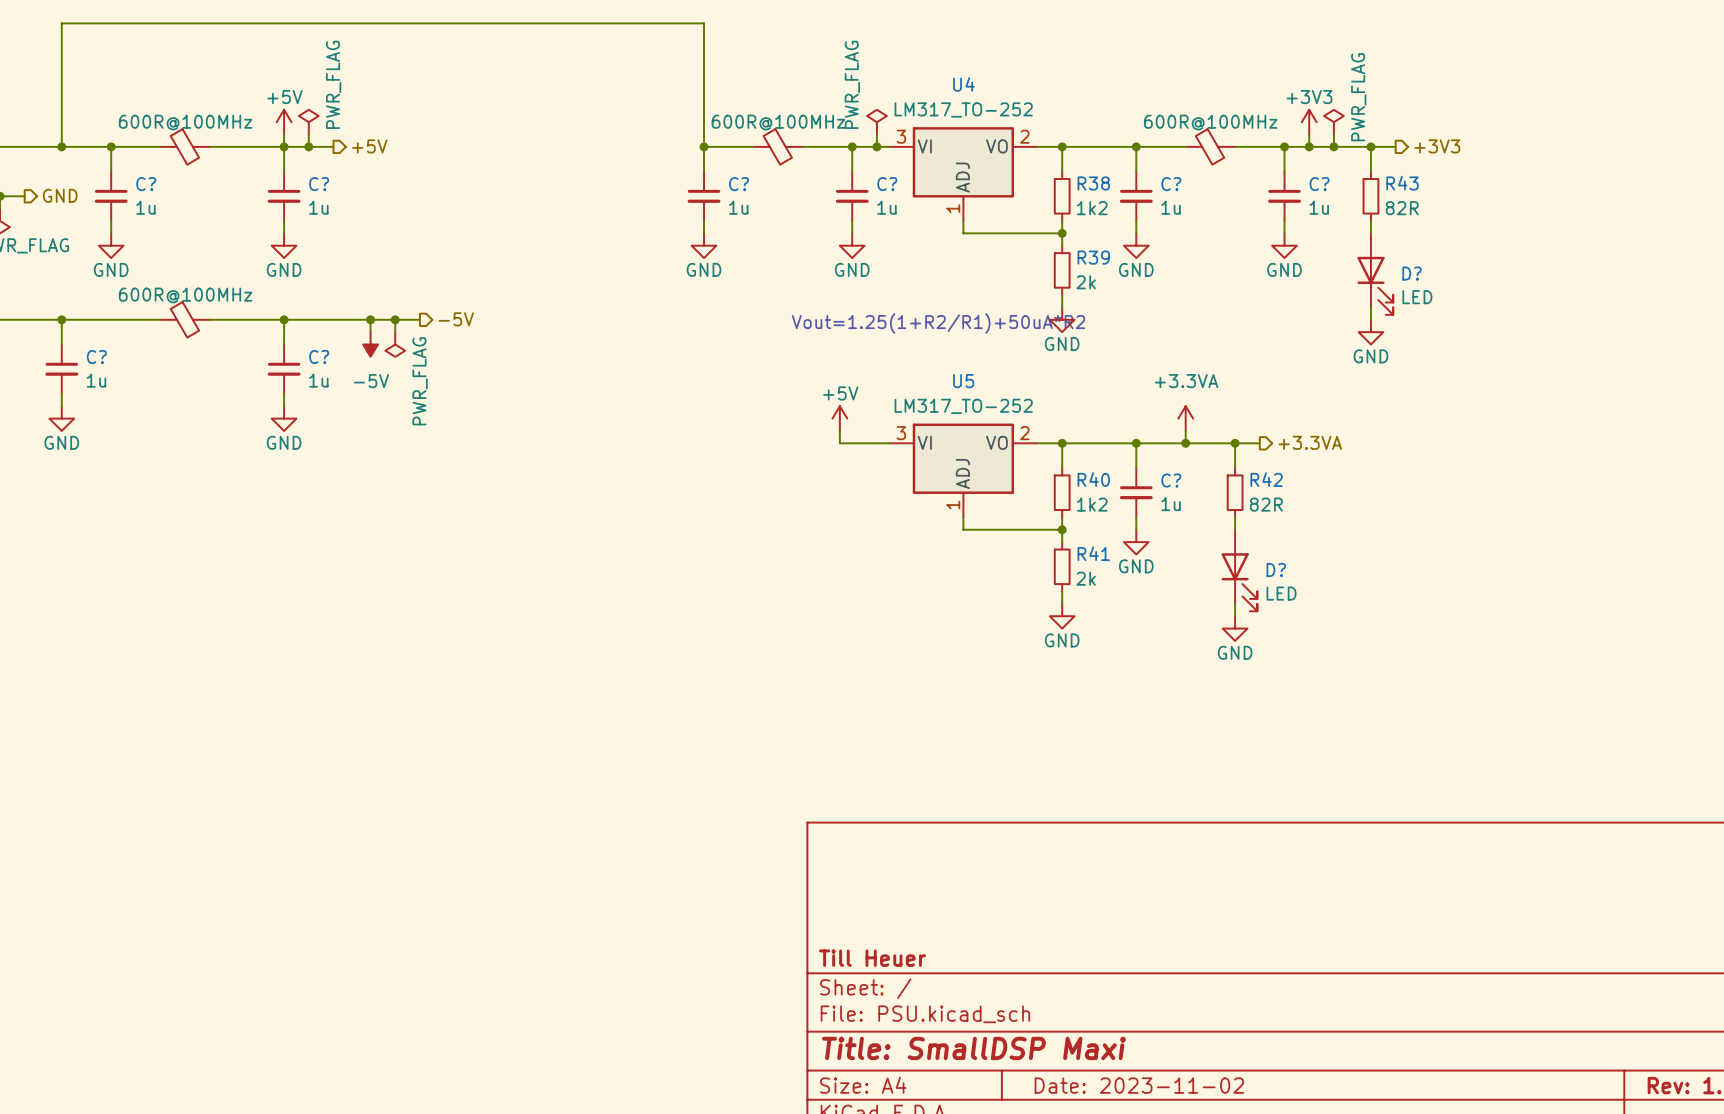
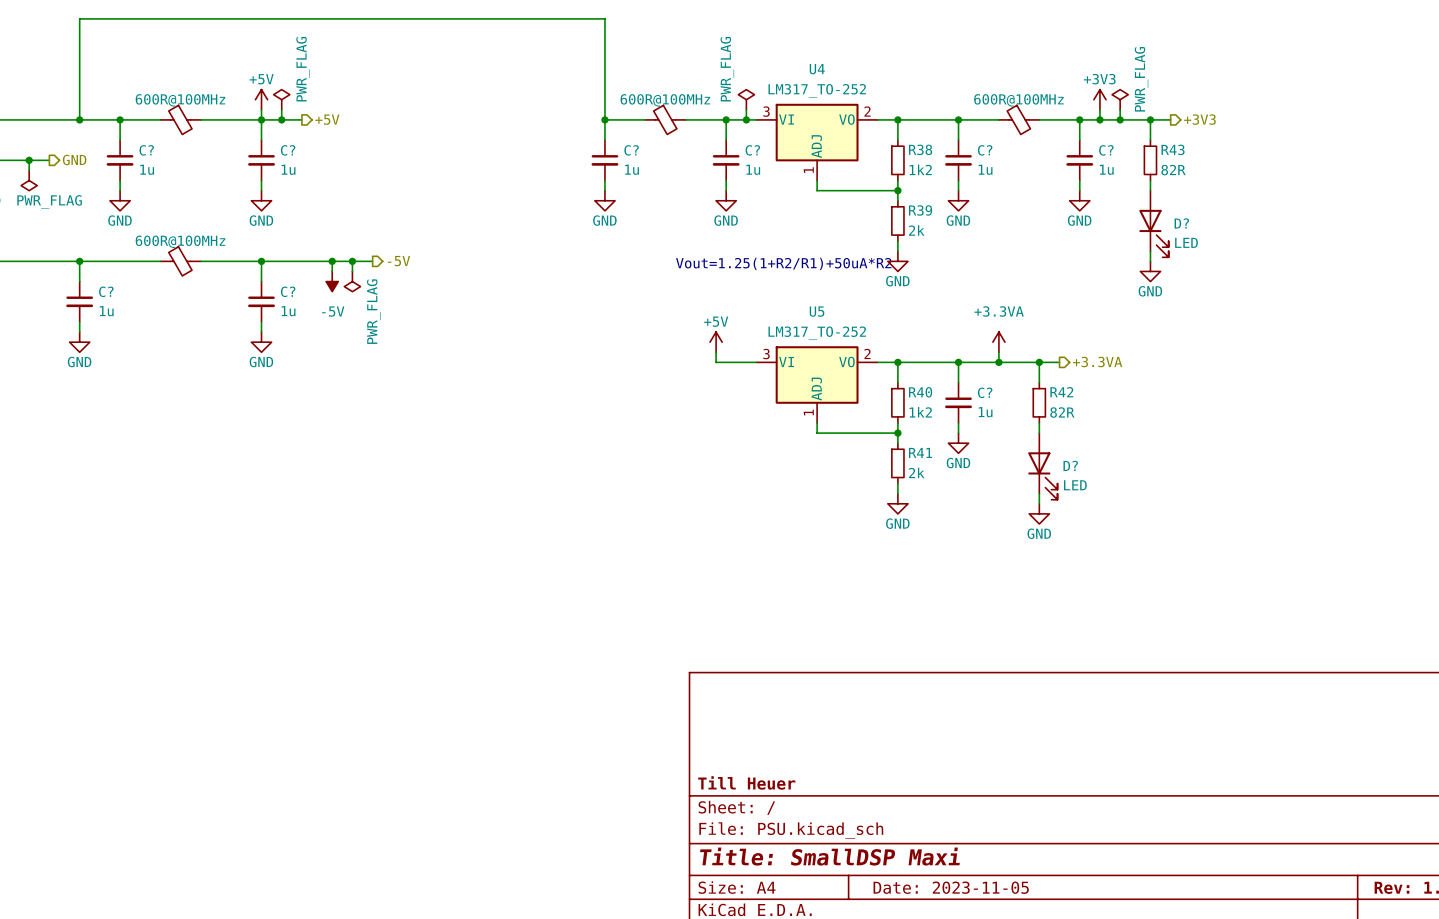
title block: Date: 2023-11-02 (1139, 1085) -> Date: 2023-11-05 (951, 887)

